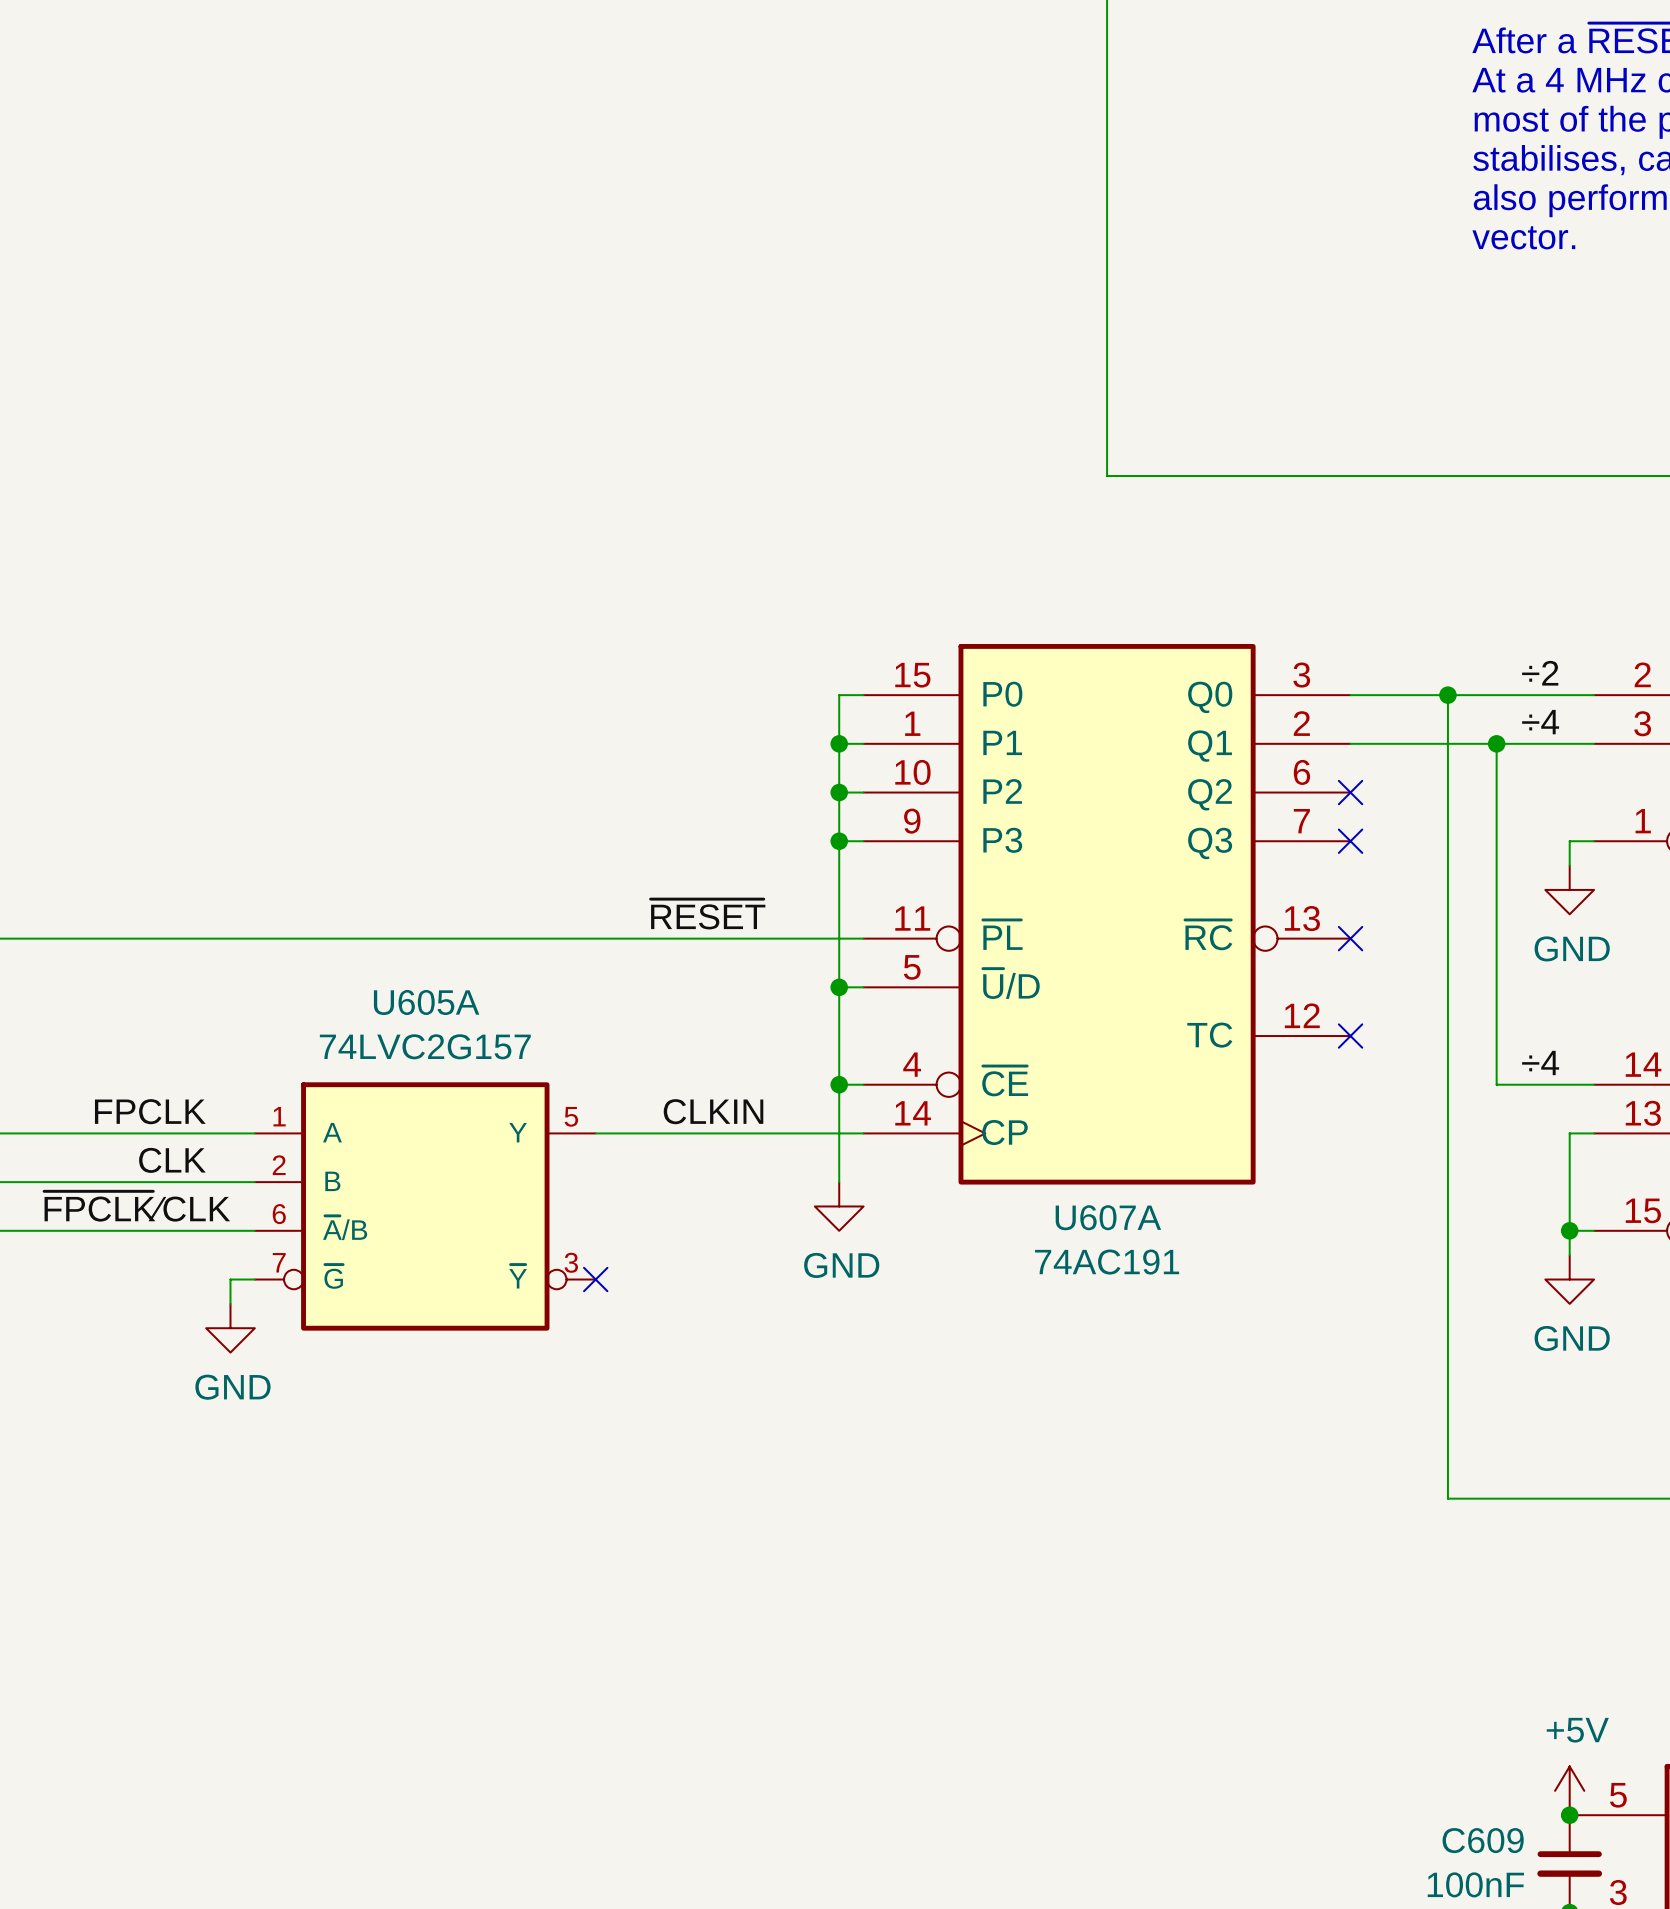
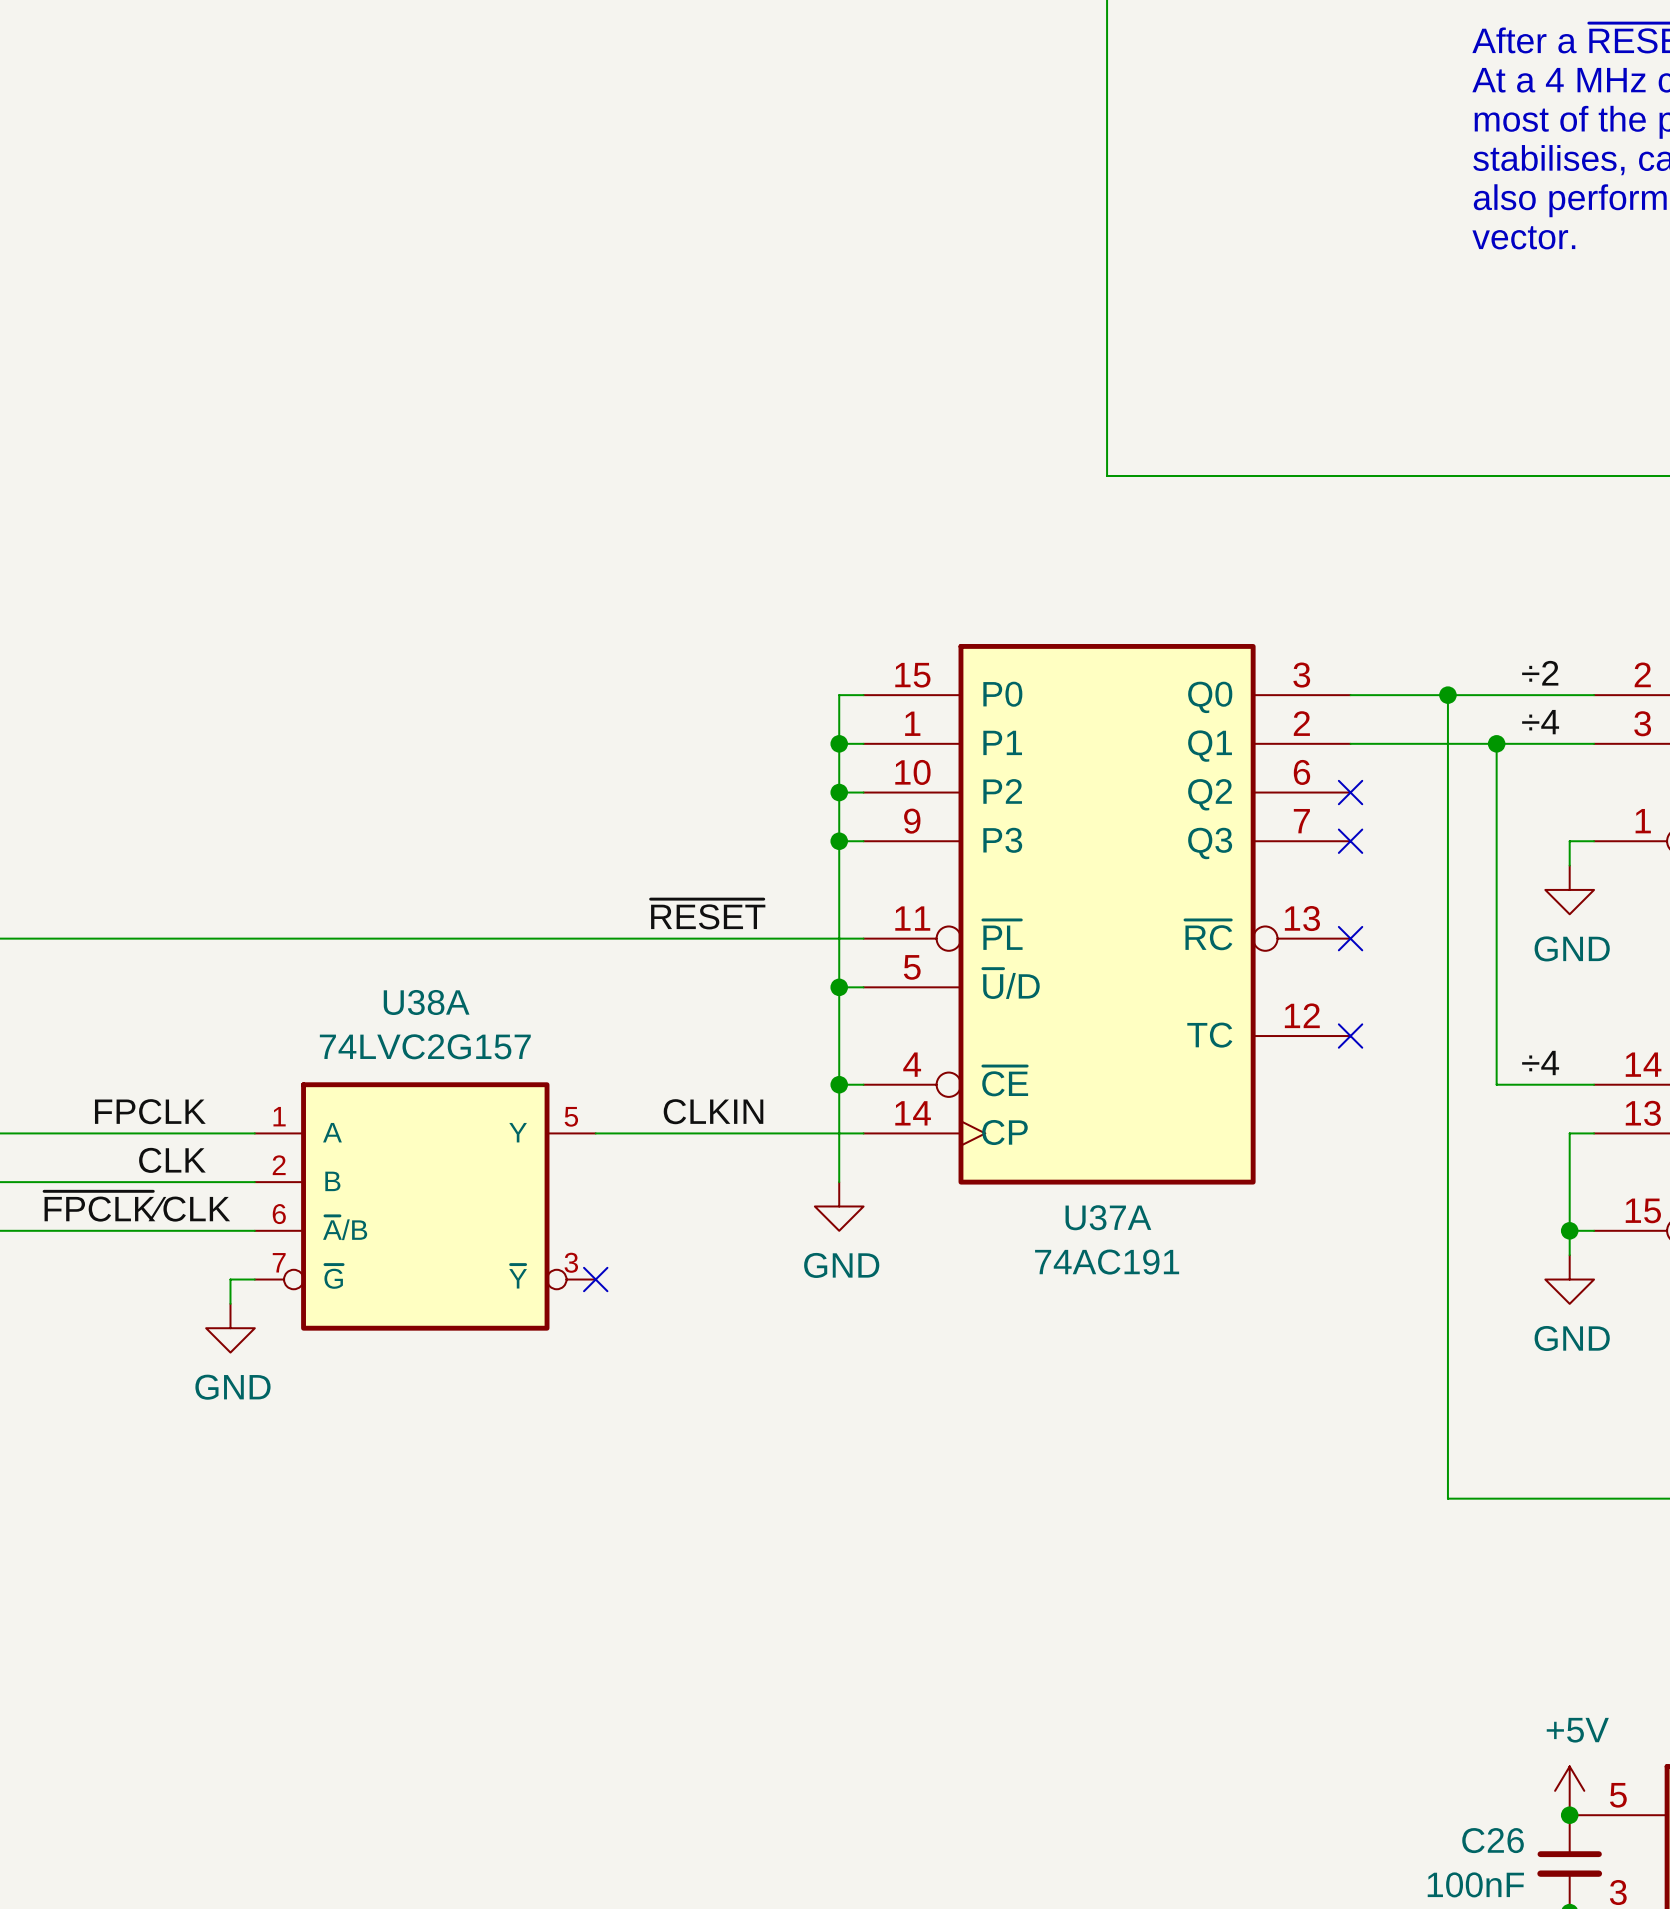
U605A name: U605A (426, 1002) -> U38A (426, 1002)
U607A name: U607A (1108, 1217) -> U37A (1108, 1217)
C609 name: C609 (1483, 1840) -> C26 (1493, 1840)

